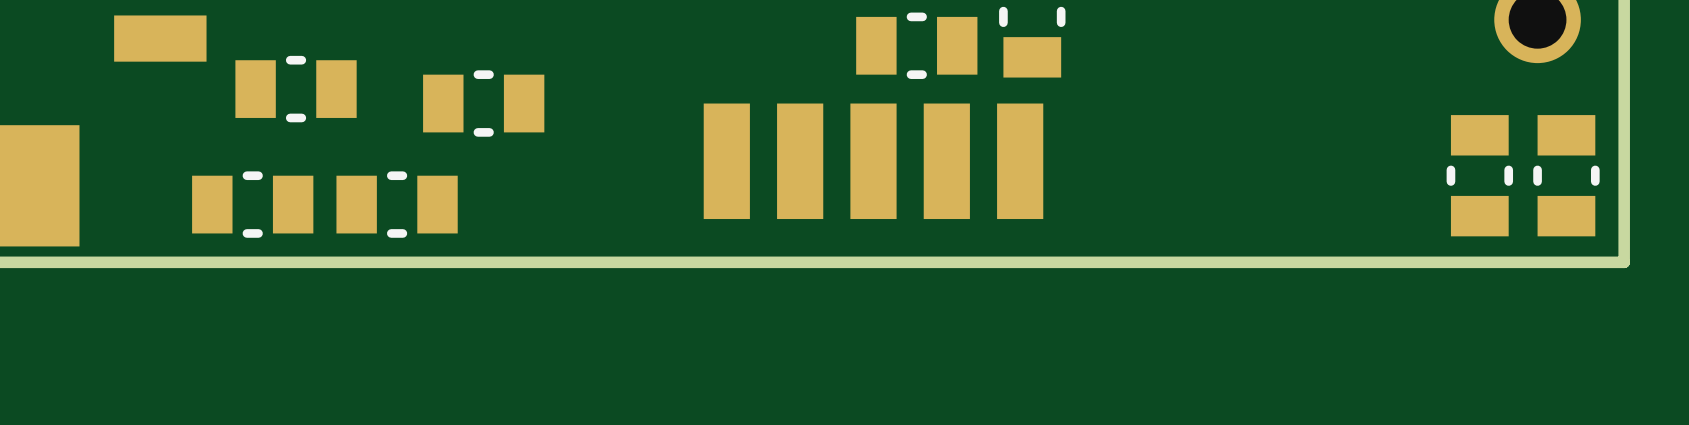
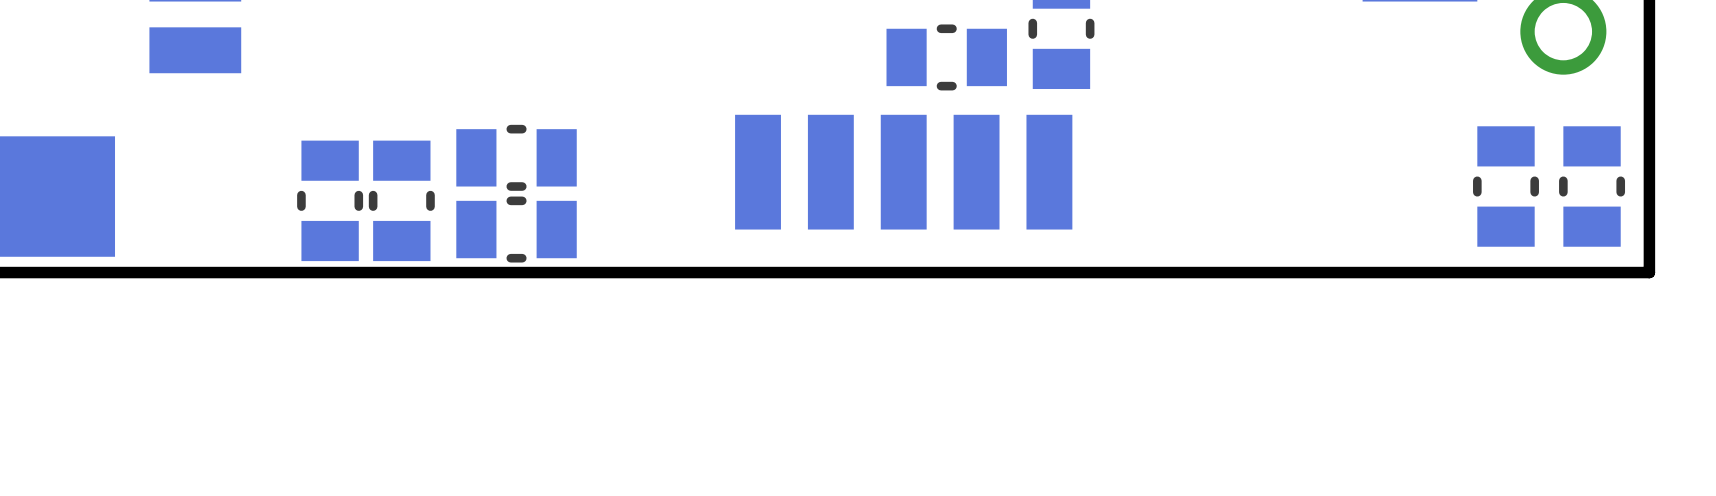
part position: (296, 89) -> (516, 229)
part position: (483, 103) -> (516, 157)
part rotation: 0° (252, 204) -> 90° clockwise (330, 200)
part rotation: 0° (397, 204) -> 90° clockwise (401, 200)

